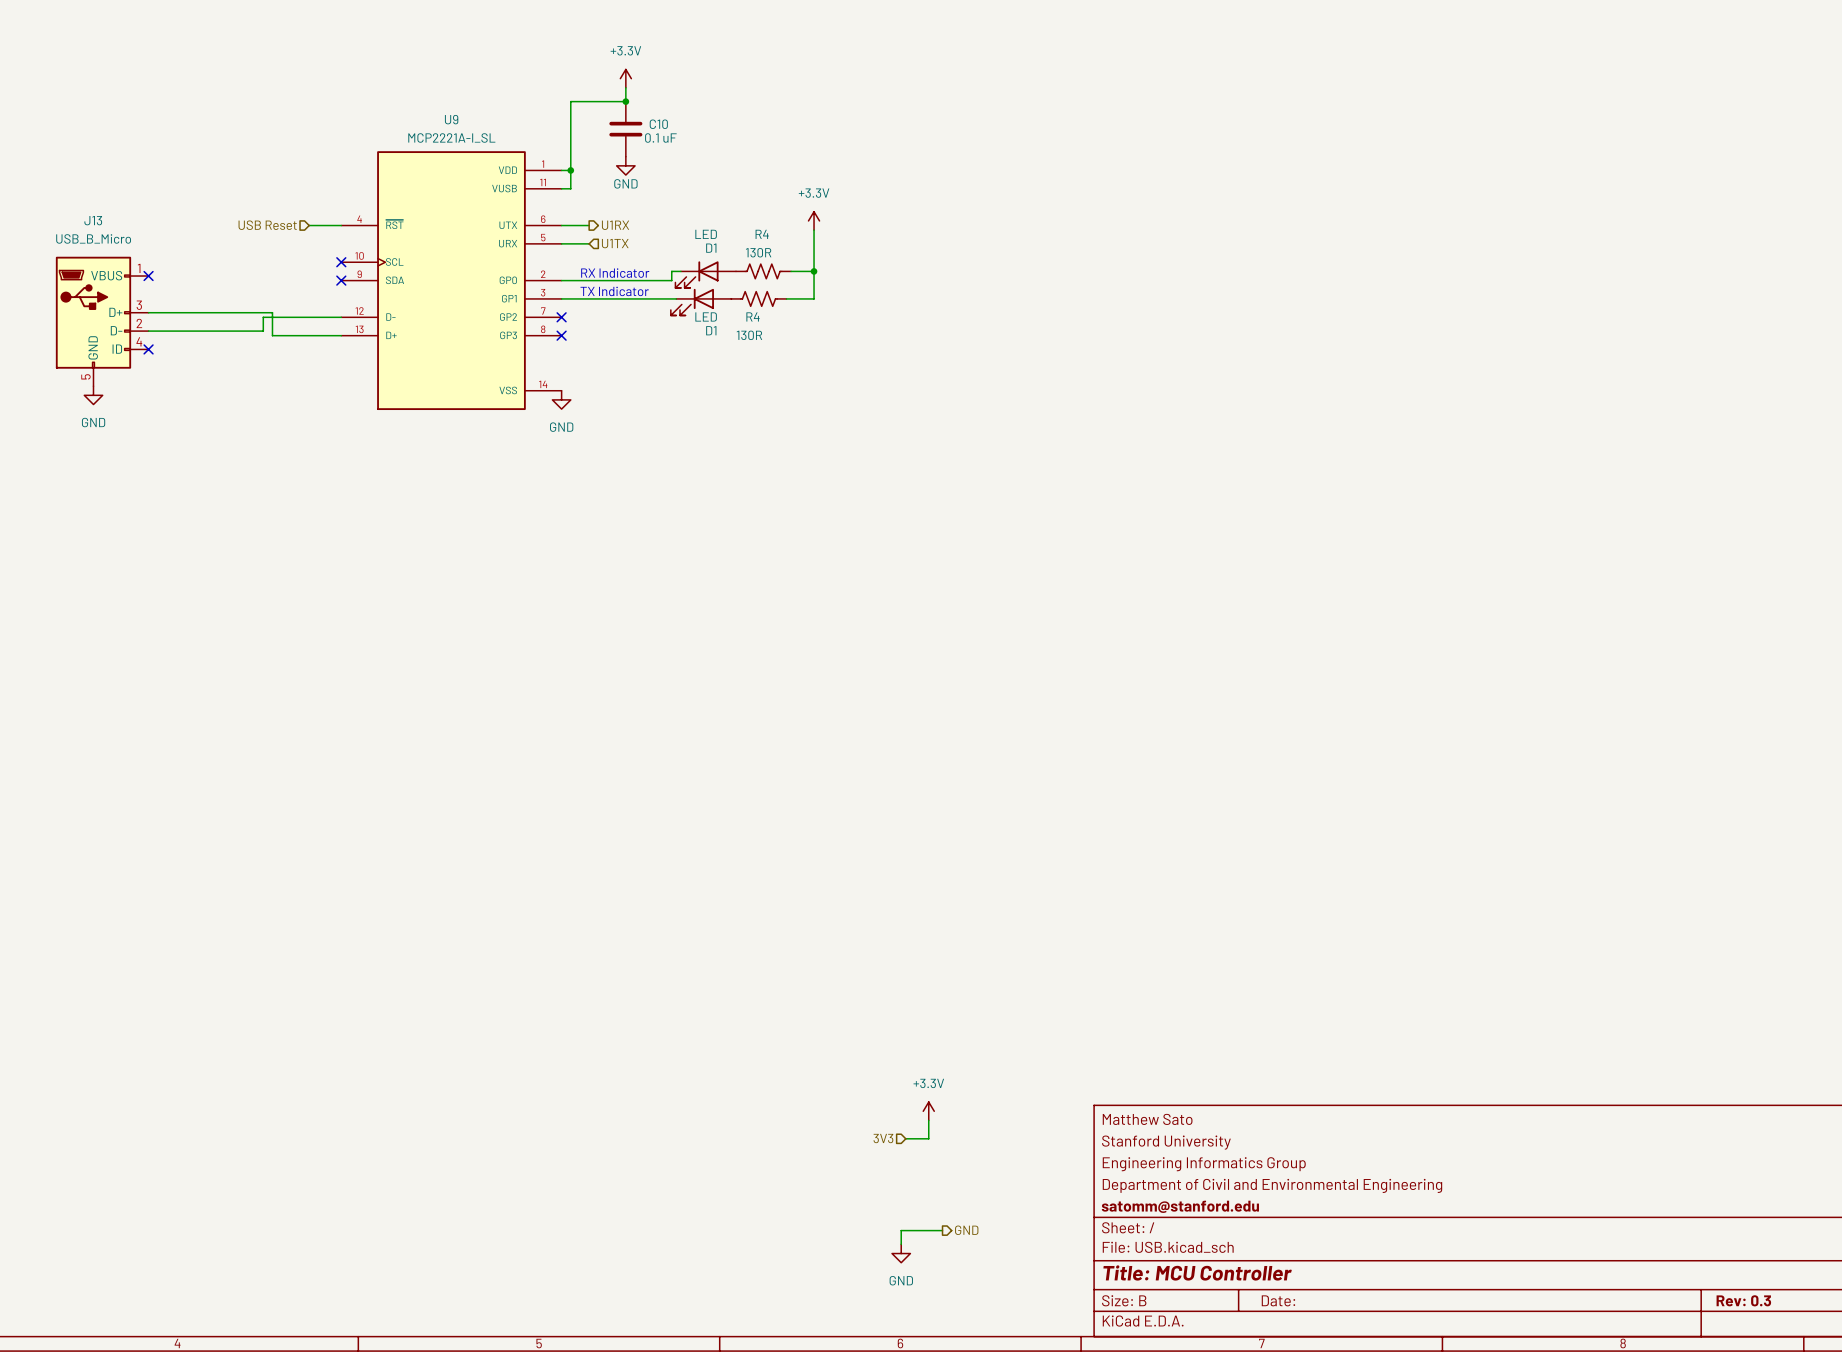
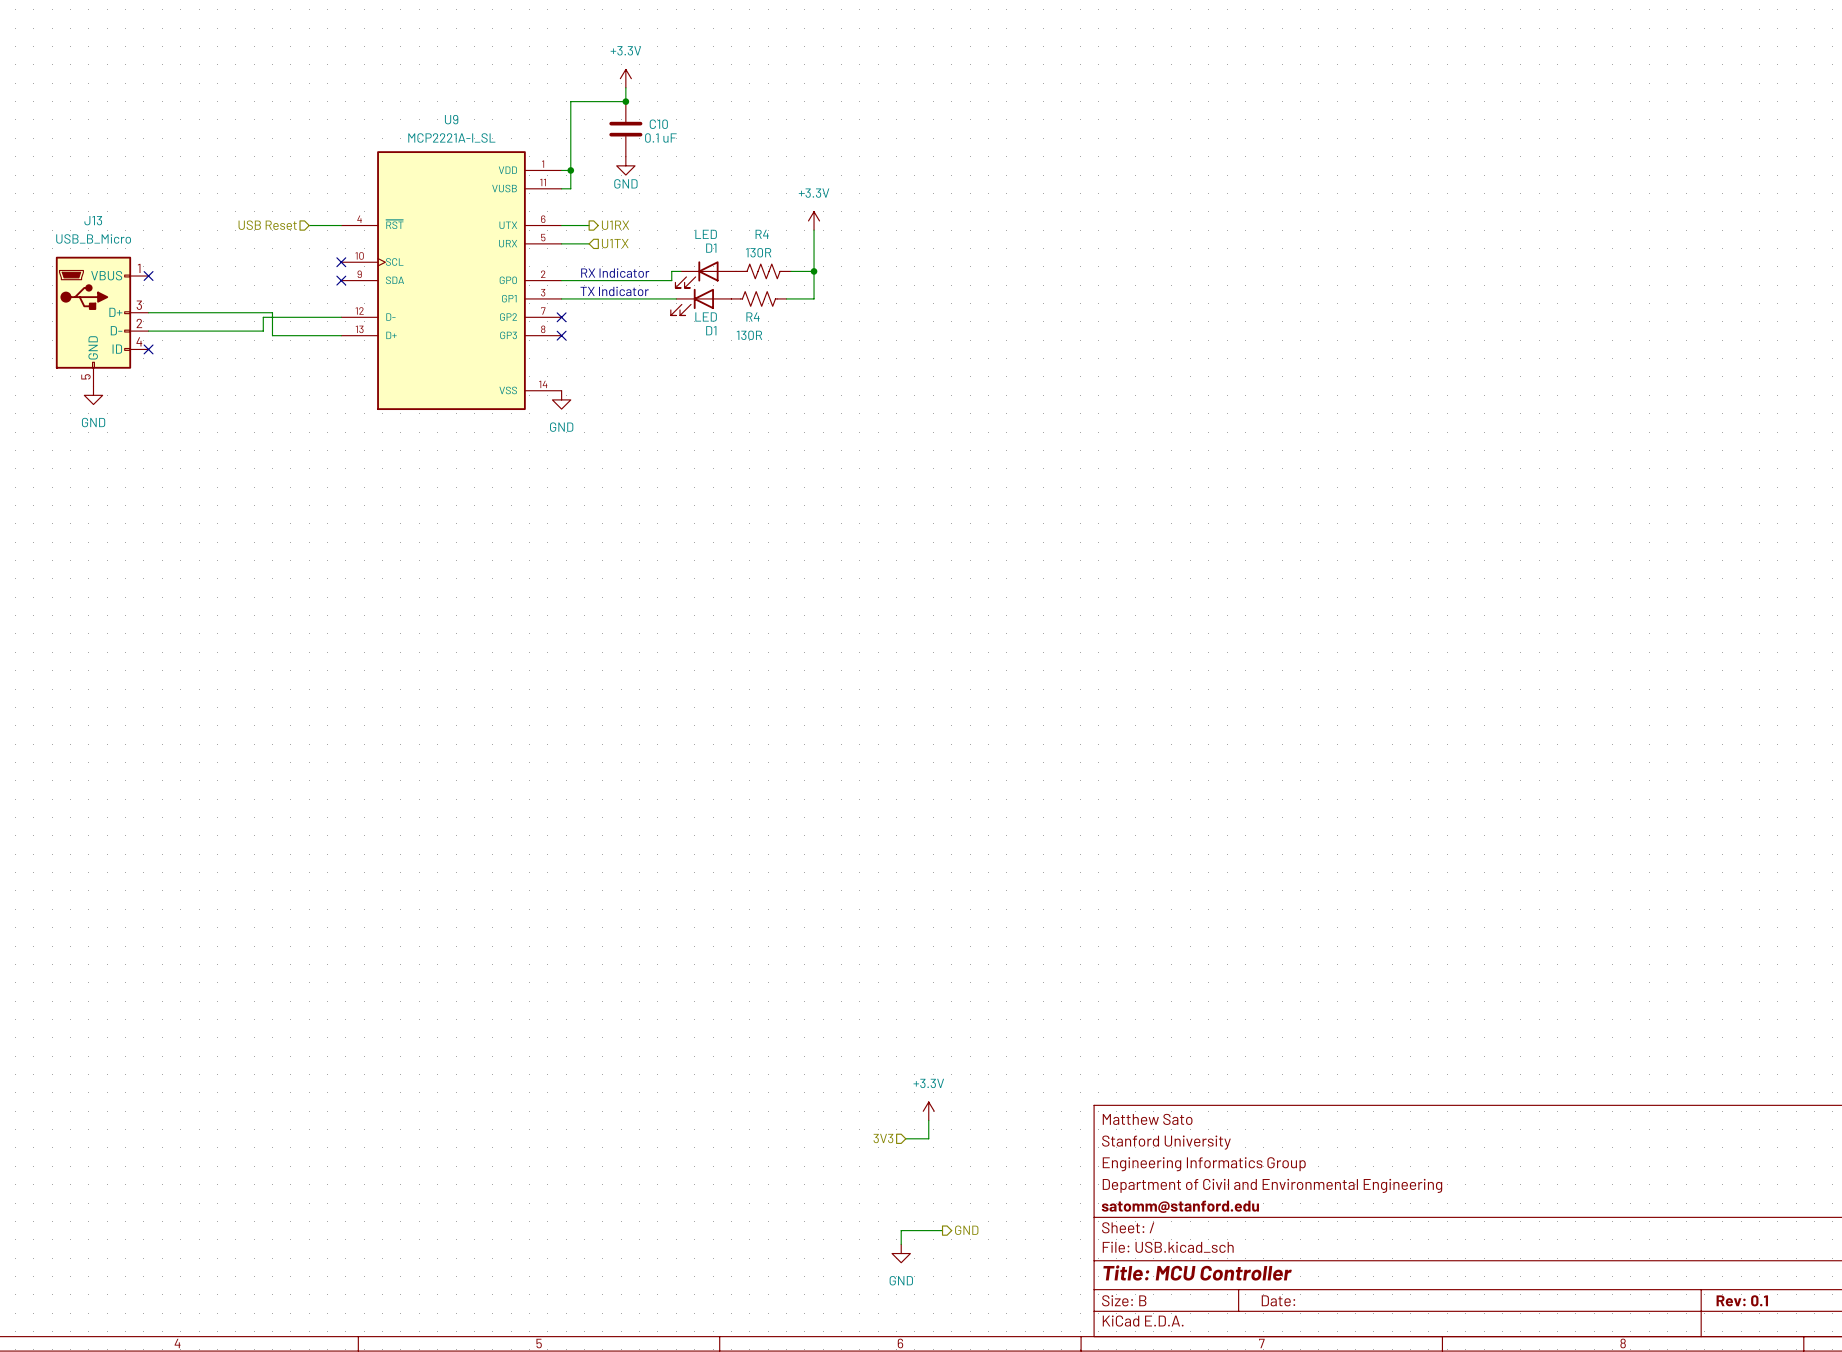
title block: Rev: 0.3 (1743, 1300) -> Rev: 0.1 (1742, 1300)

